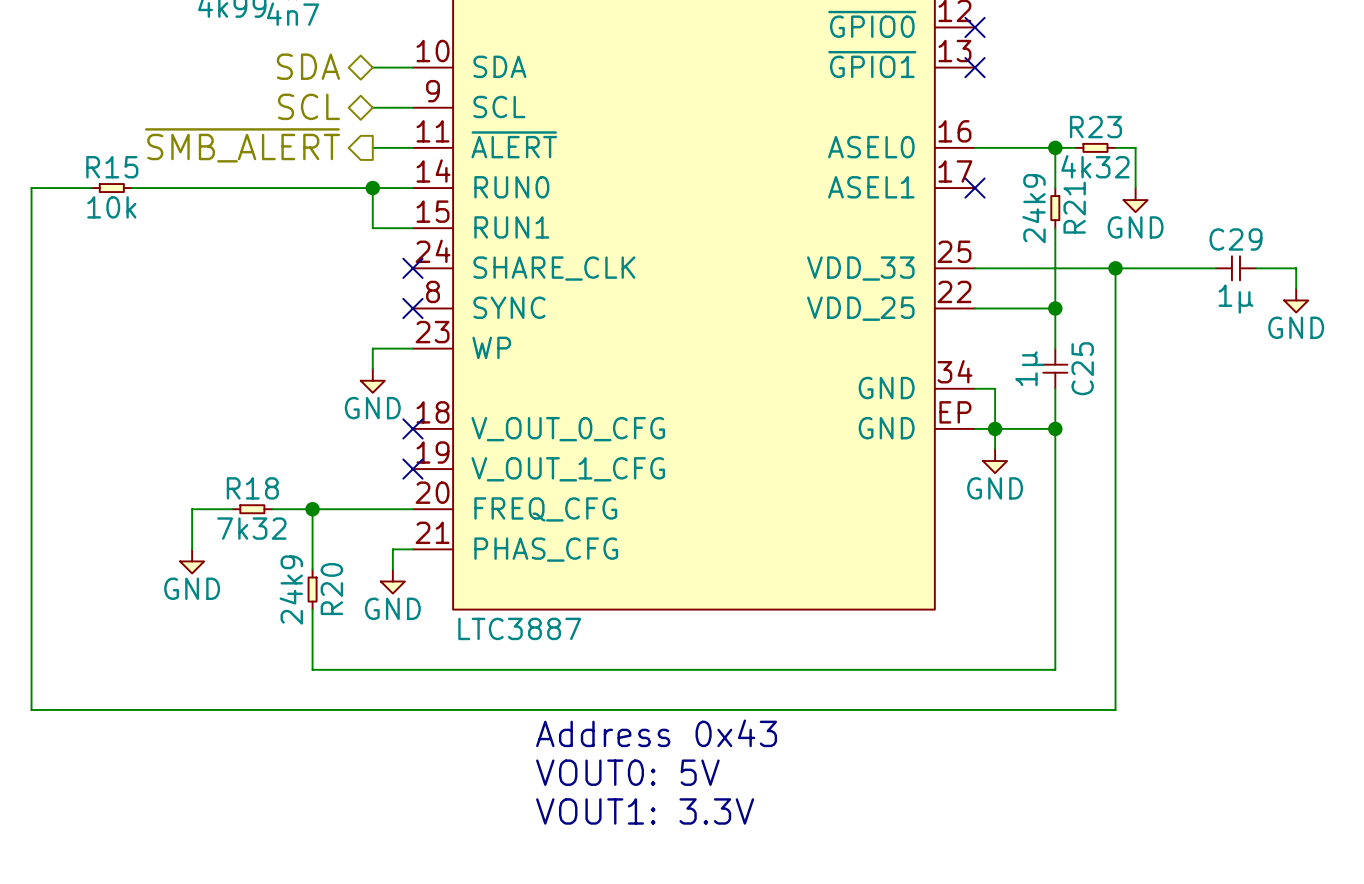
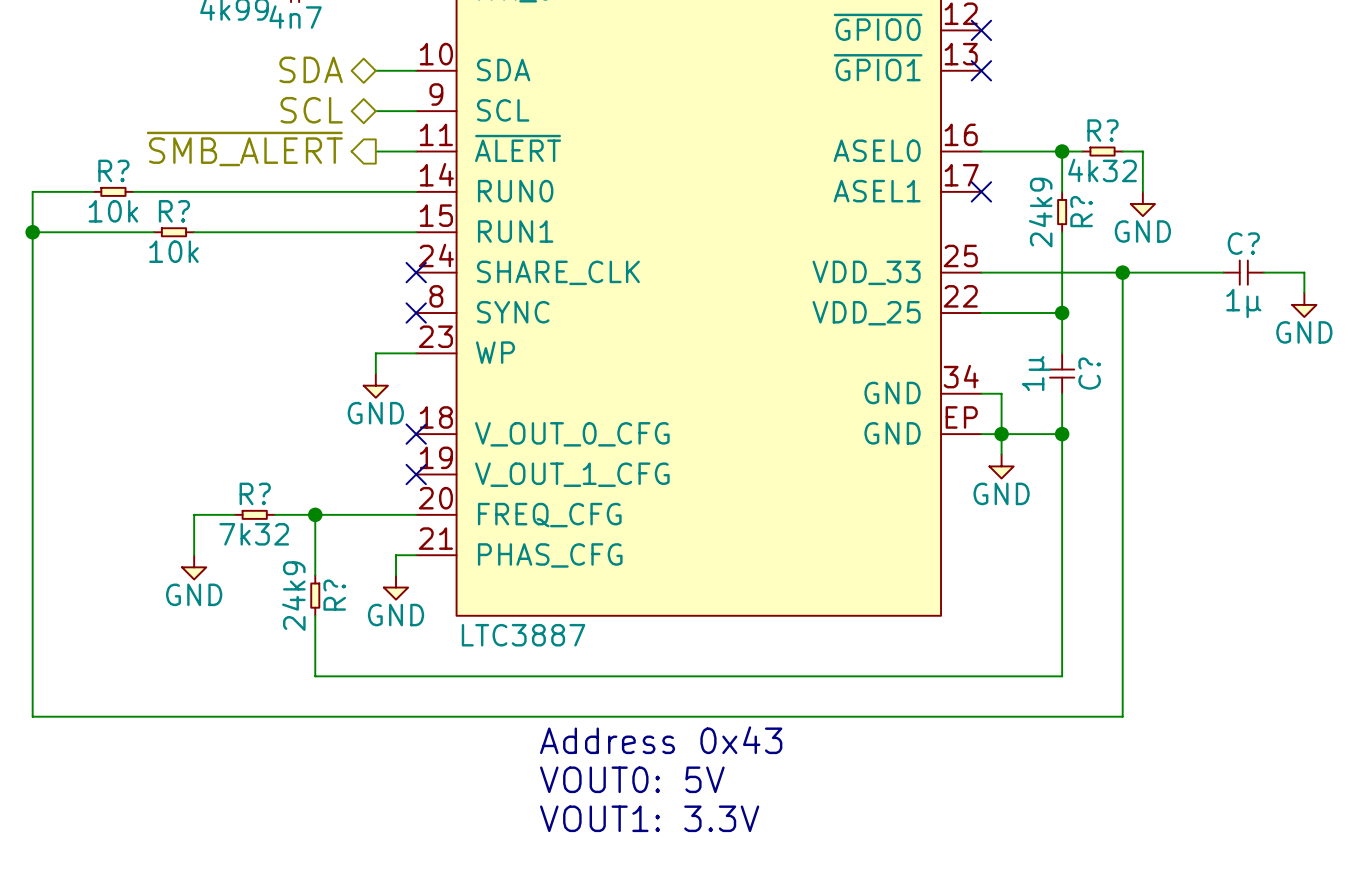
R23 name: R23 (1095, 127) -> R? (1102, 130)
R15 name: R15 (112, 167) -> R? (113, 170)
wire: (372, 188) (372, 228) -> (194, 232) (375, 232)
junction: (372, 188) -> none
R21 name: R21 (1074, 207) -> R? (1081, 211)
wire: none -> (32, 232) (153, 232)
junction: none -> (32, 232)
R?: none -> 10k (173, 232)
C29 name: C29 (1235, 239) -> C? (1243, 243)
C25 name: C25 (1082, 368) -> C? (1089, 373)
R18 name: R18 (252, 488) -> R? (255, 493)
R20 name: R20 (331, 589) -> R? (334, 595)

